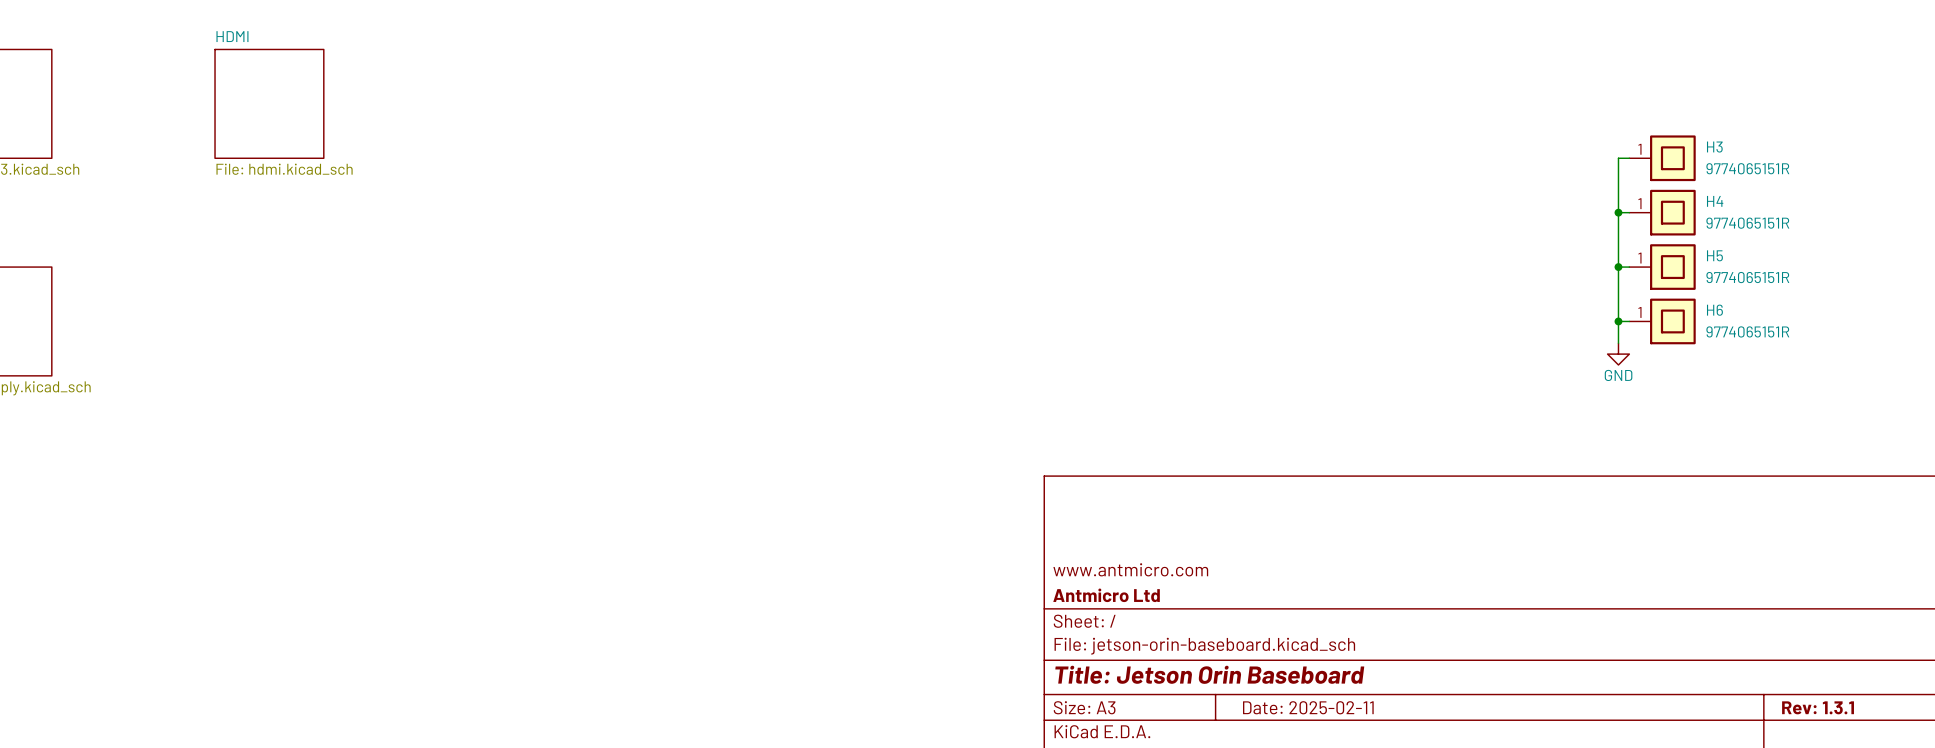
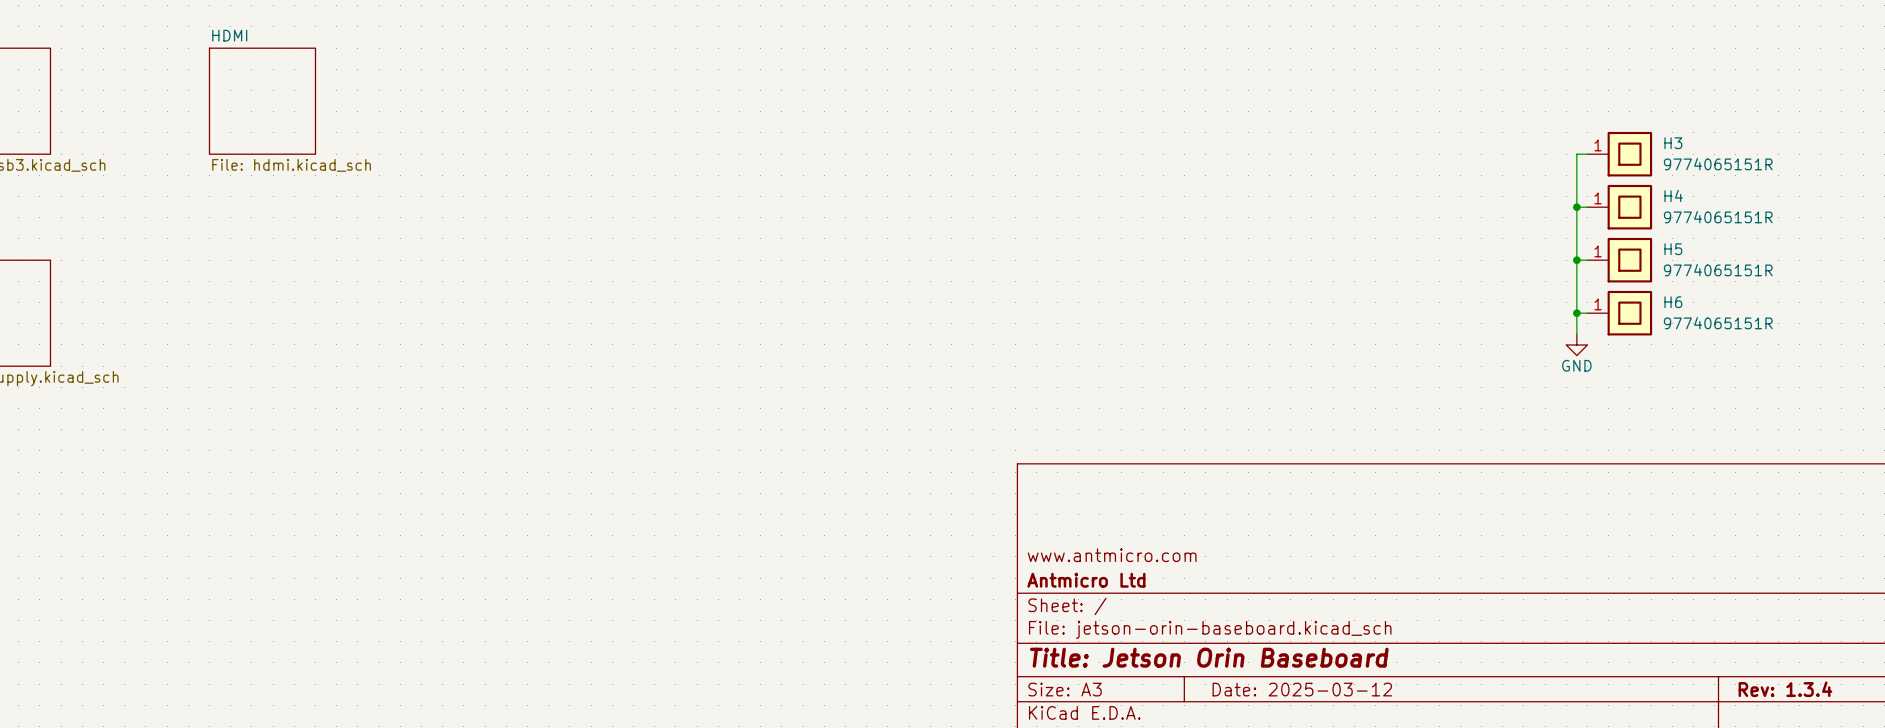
title block: Date: 2025-02-11 (1308, 707) -> Date: 2025-03-12 (1302, 689)
title block: Rev: 1.3.1 (1818, 707) -> Rev: 1.3.4 (1785, 689)

